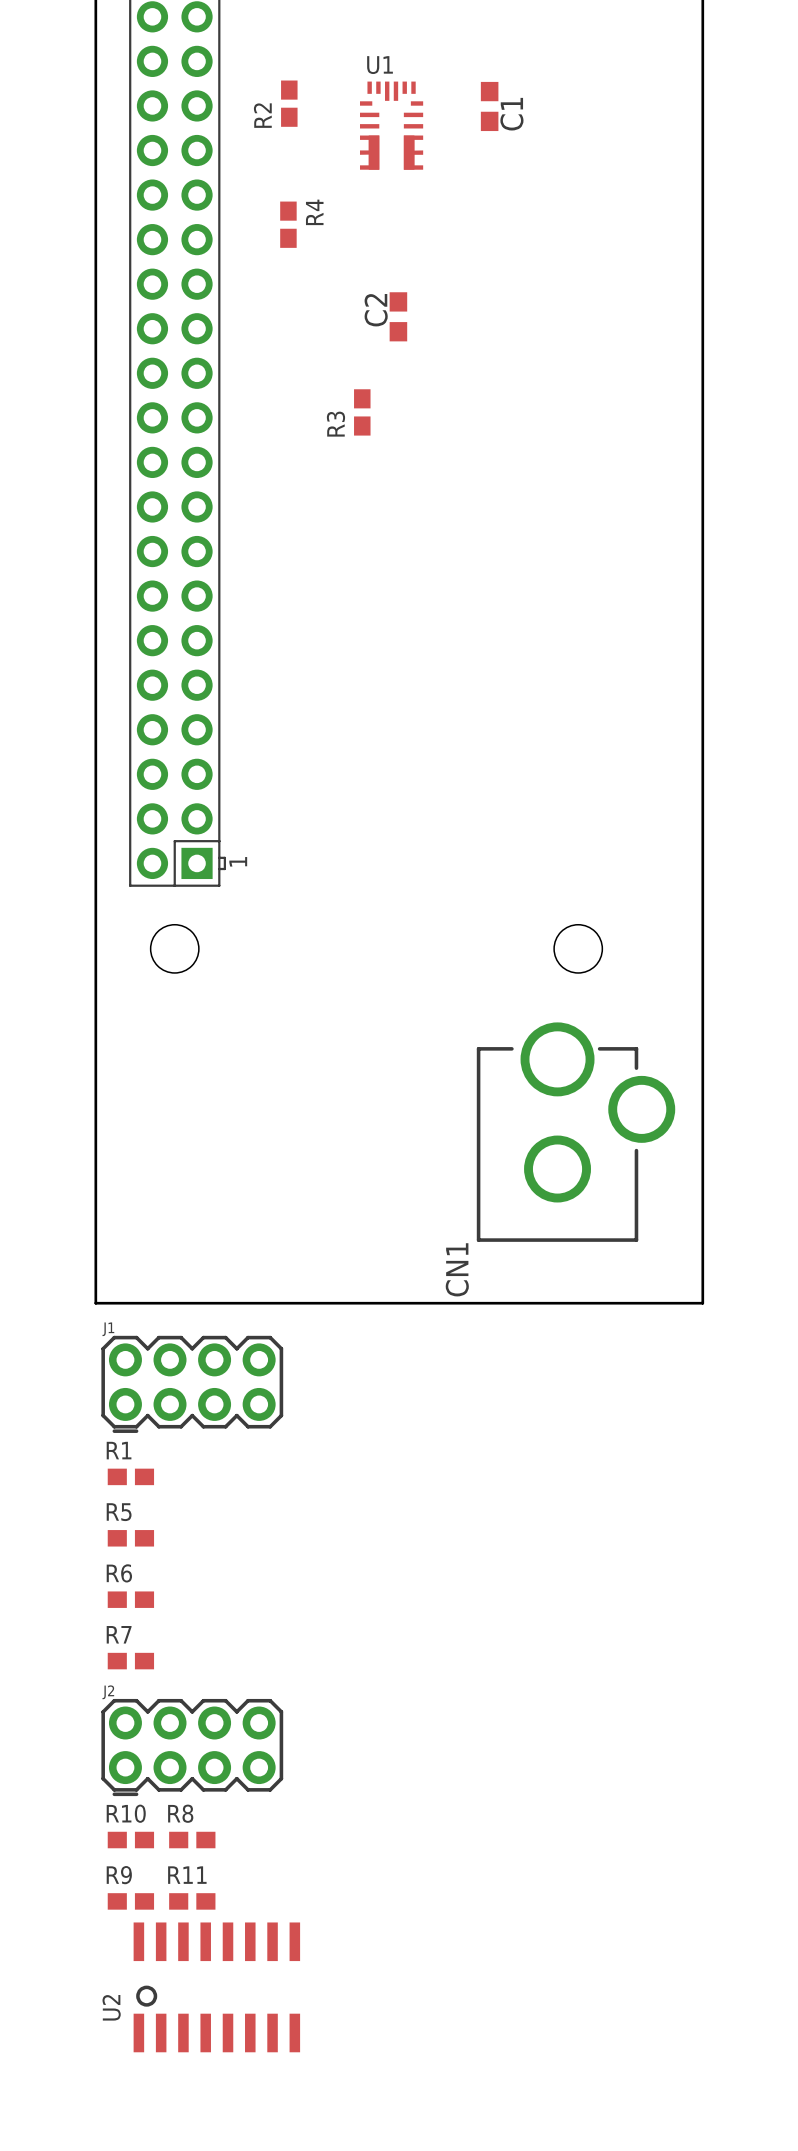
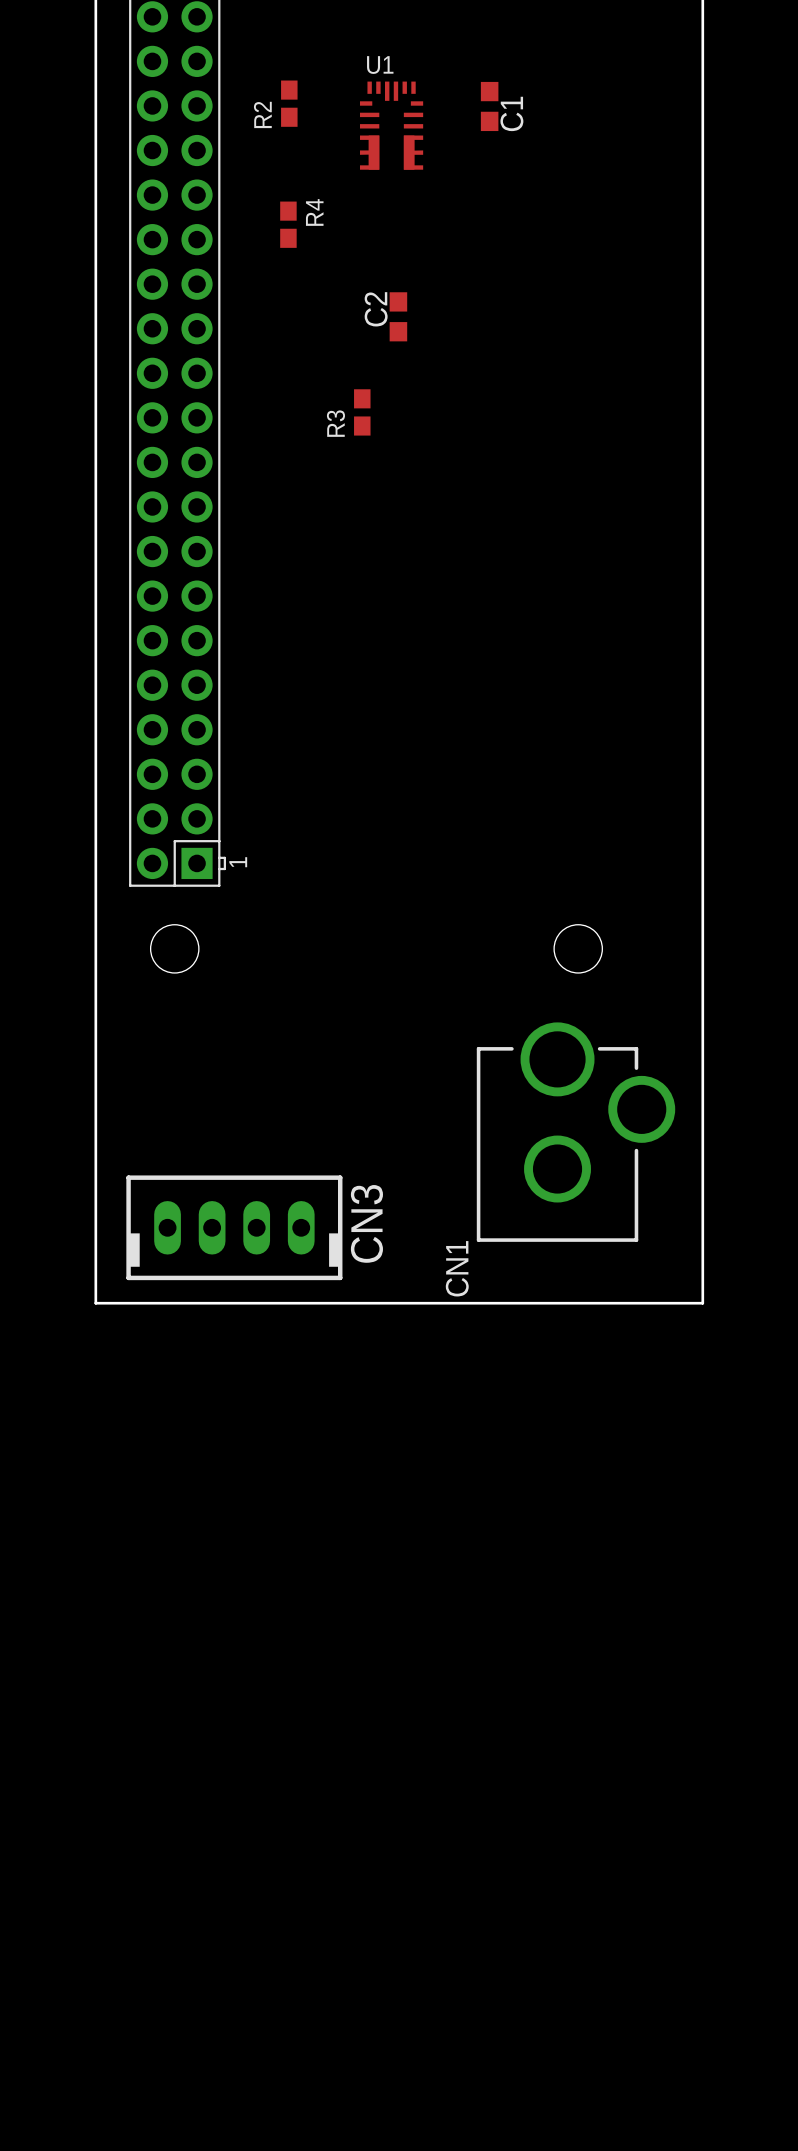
CN3: none -> (234, 1227)
J1: (192, 1384) -> none
R1: (130, 1476) -> none
R5: (130, 1538) -> none
R6: (130, 1599) -> none
R7: (130, 1661) -> none
J2: (192, 1747) -> none
R10: (130, 1840) -> none
R8: (192, 1840) -> none
R9: (130, 1901) -> none
R11: (192, 1901) -> none
U2: (216, 1987) -> none

